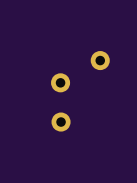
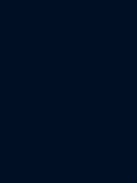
part: (100, 60) -> none
part: (60, 82) -> none
part: (61, 122) -> none

